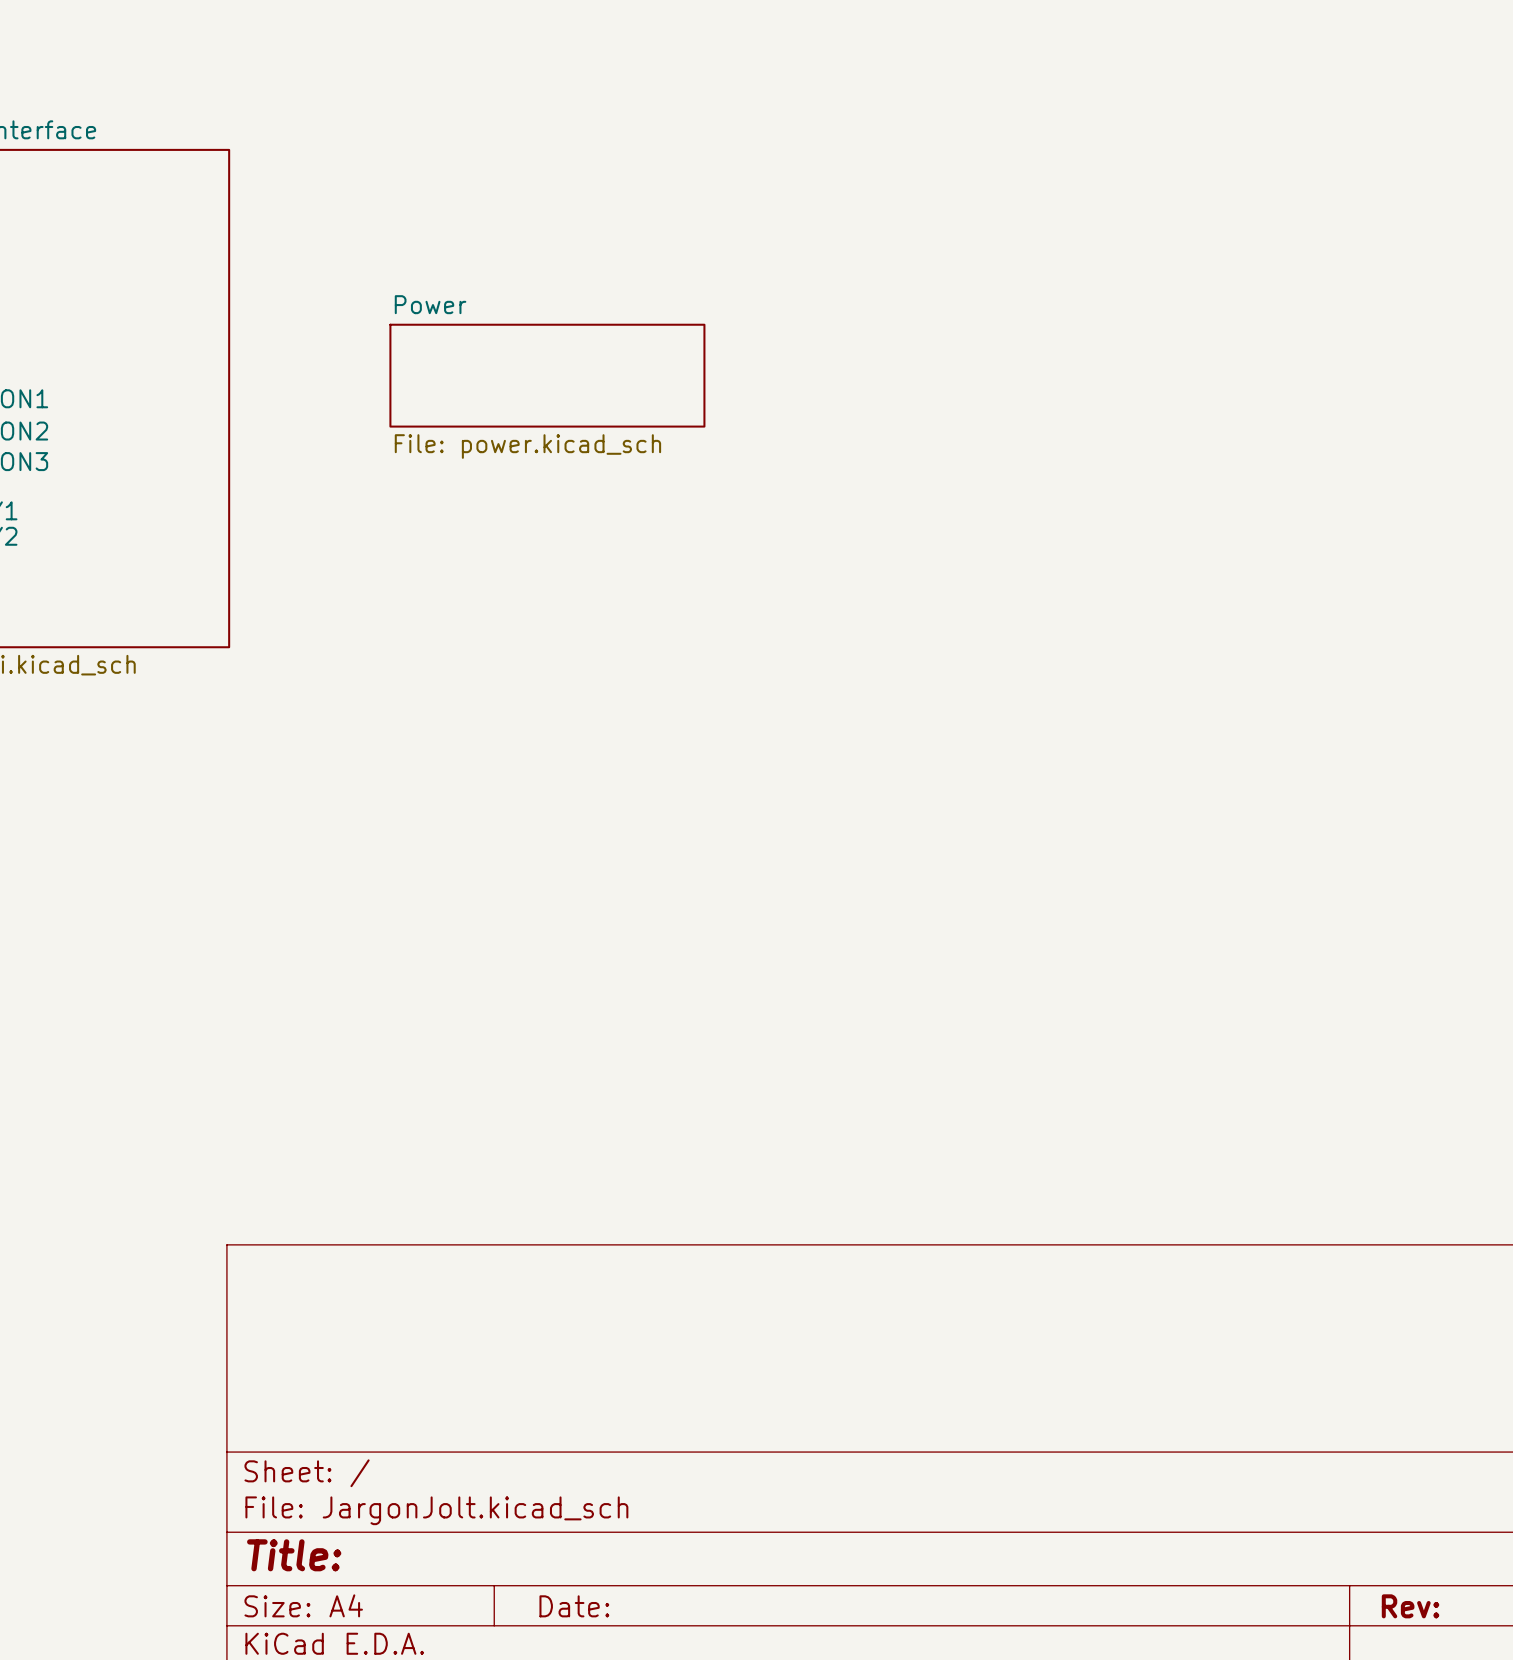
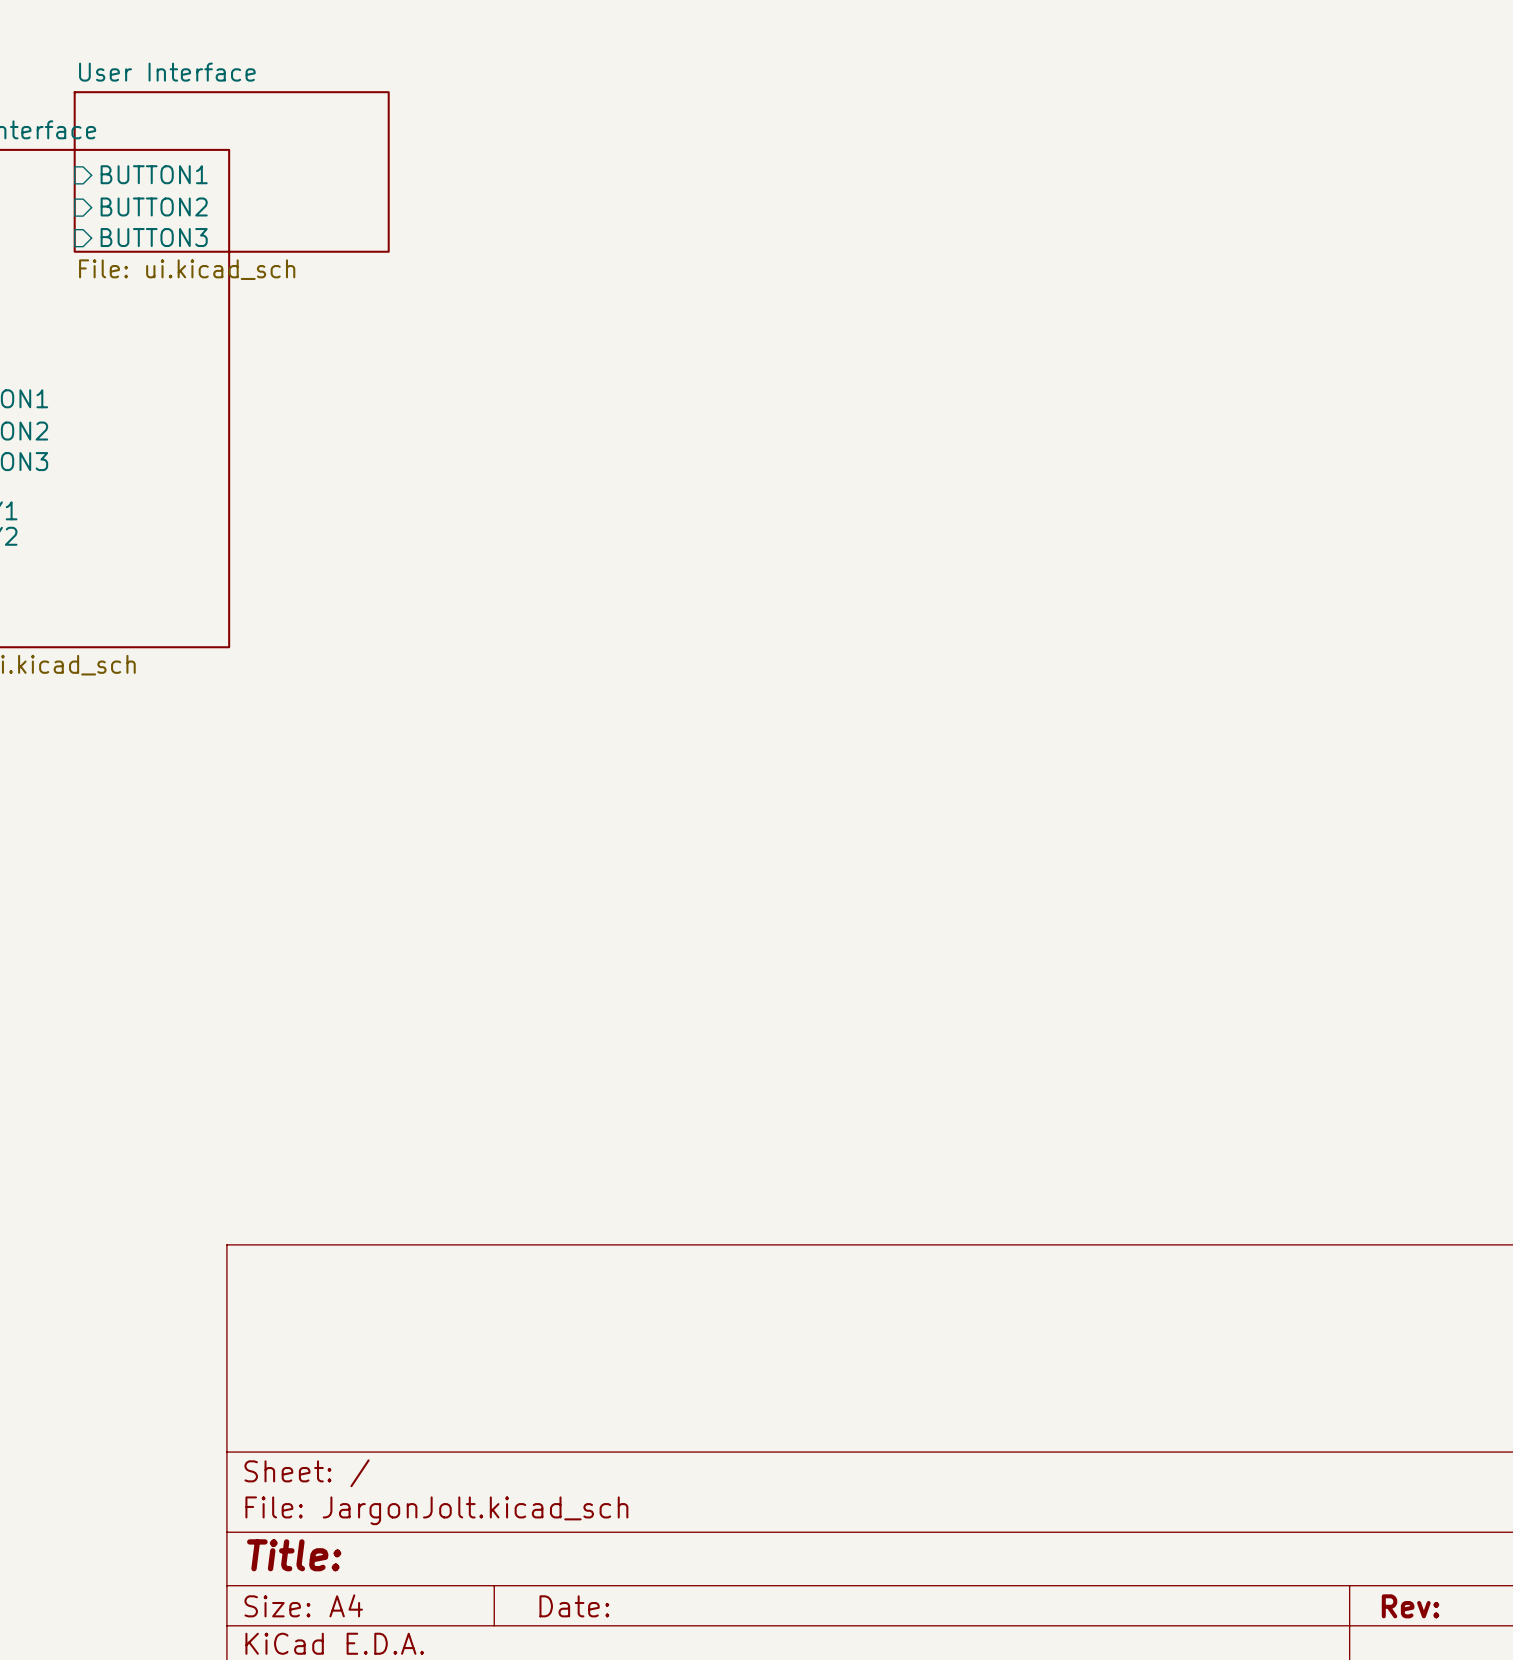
sheet User Interface: none -> File: ui.kicad_sch (231, 171)
sheet pin: none -> BUTTON1 (154, 174)
sheet pin: none -> BUTTON2 (154, 206)
sheet pin: none -> BUTTON3 (154, 237)
sheet Power: File: power.kicad_sch (547, 375) -> none

